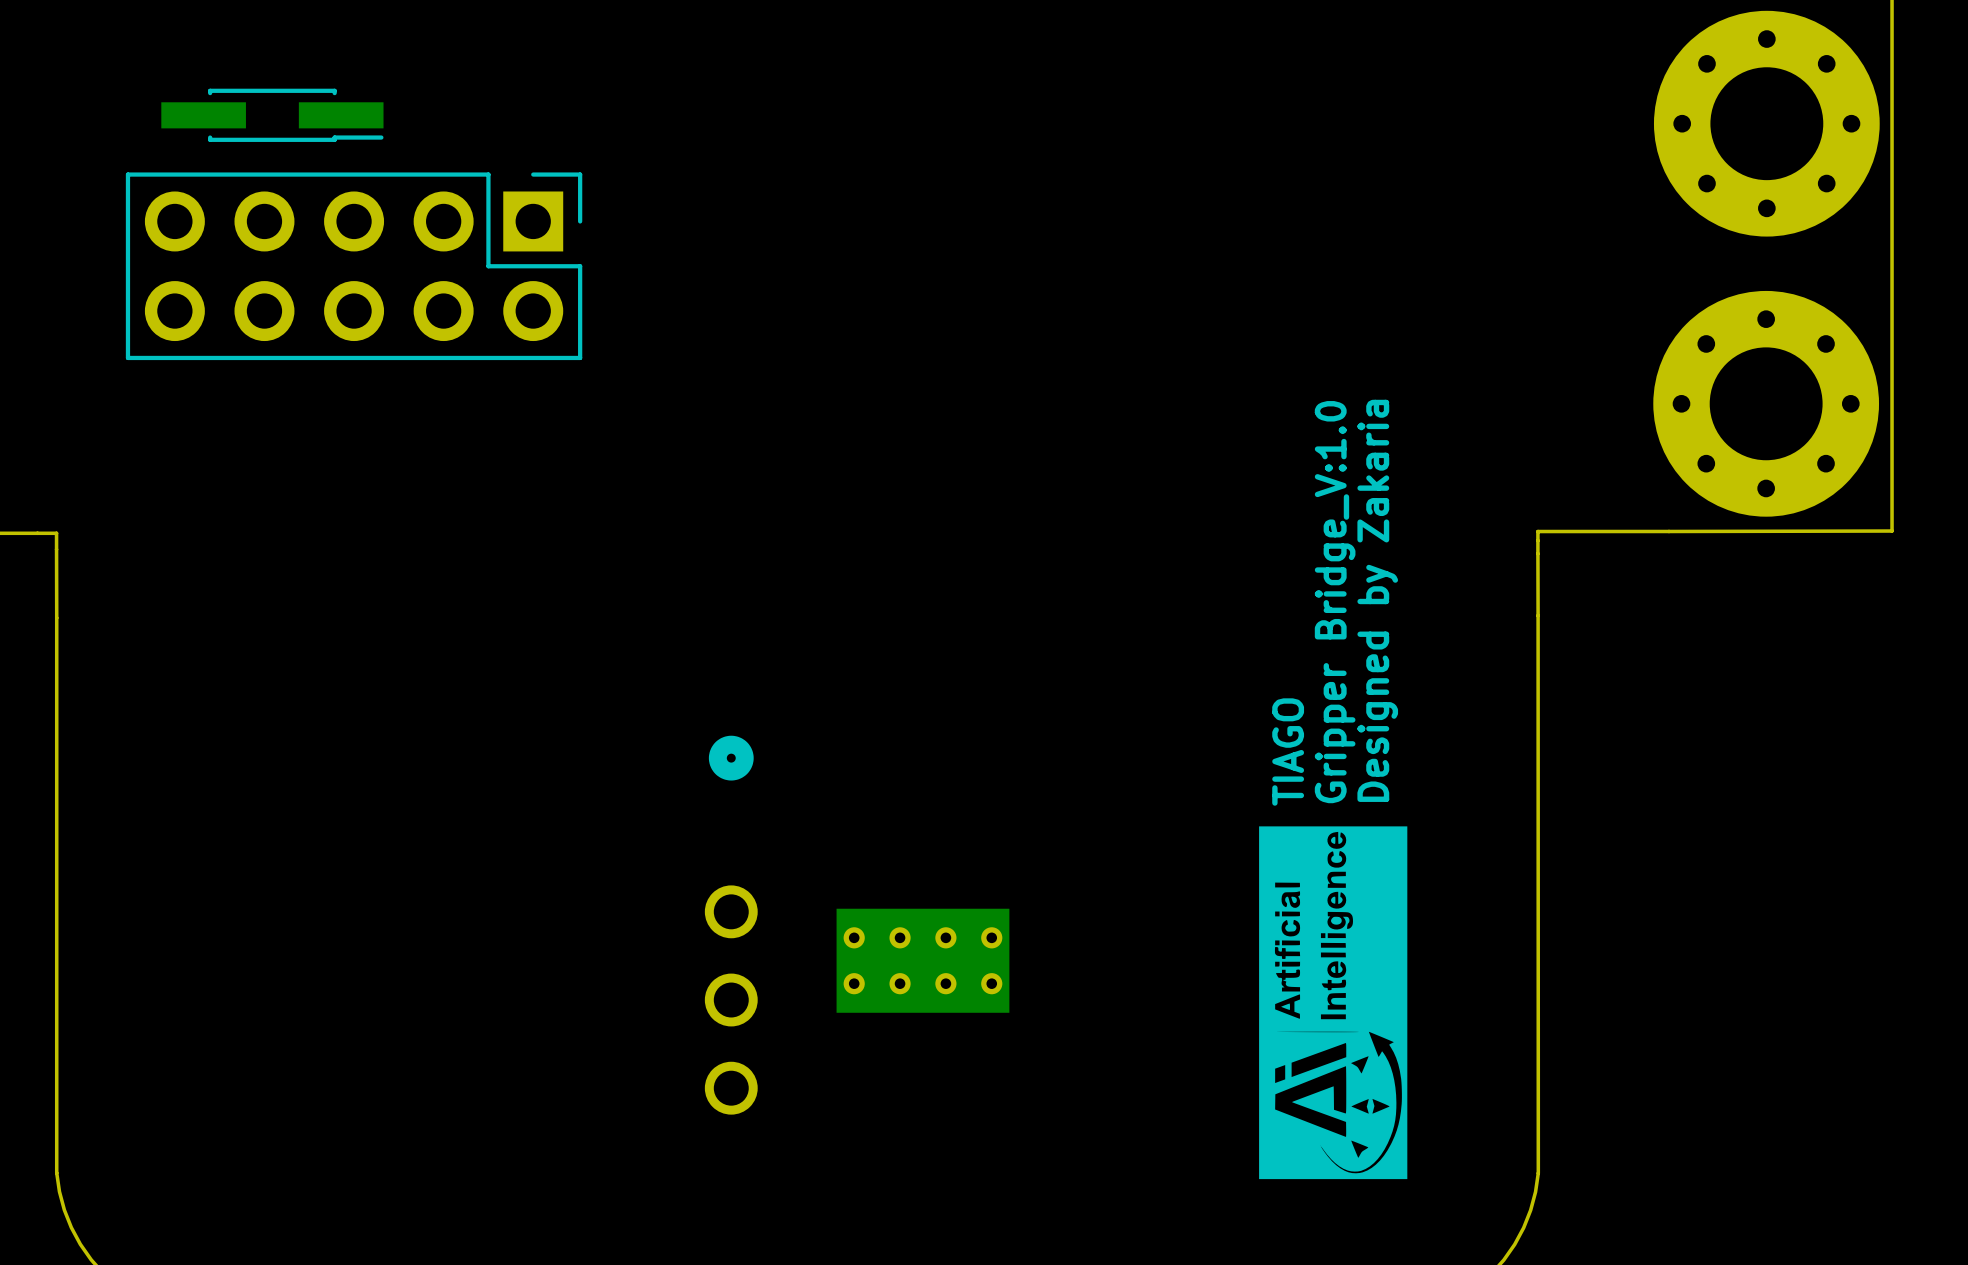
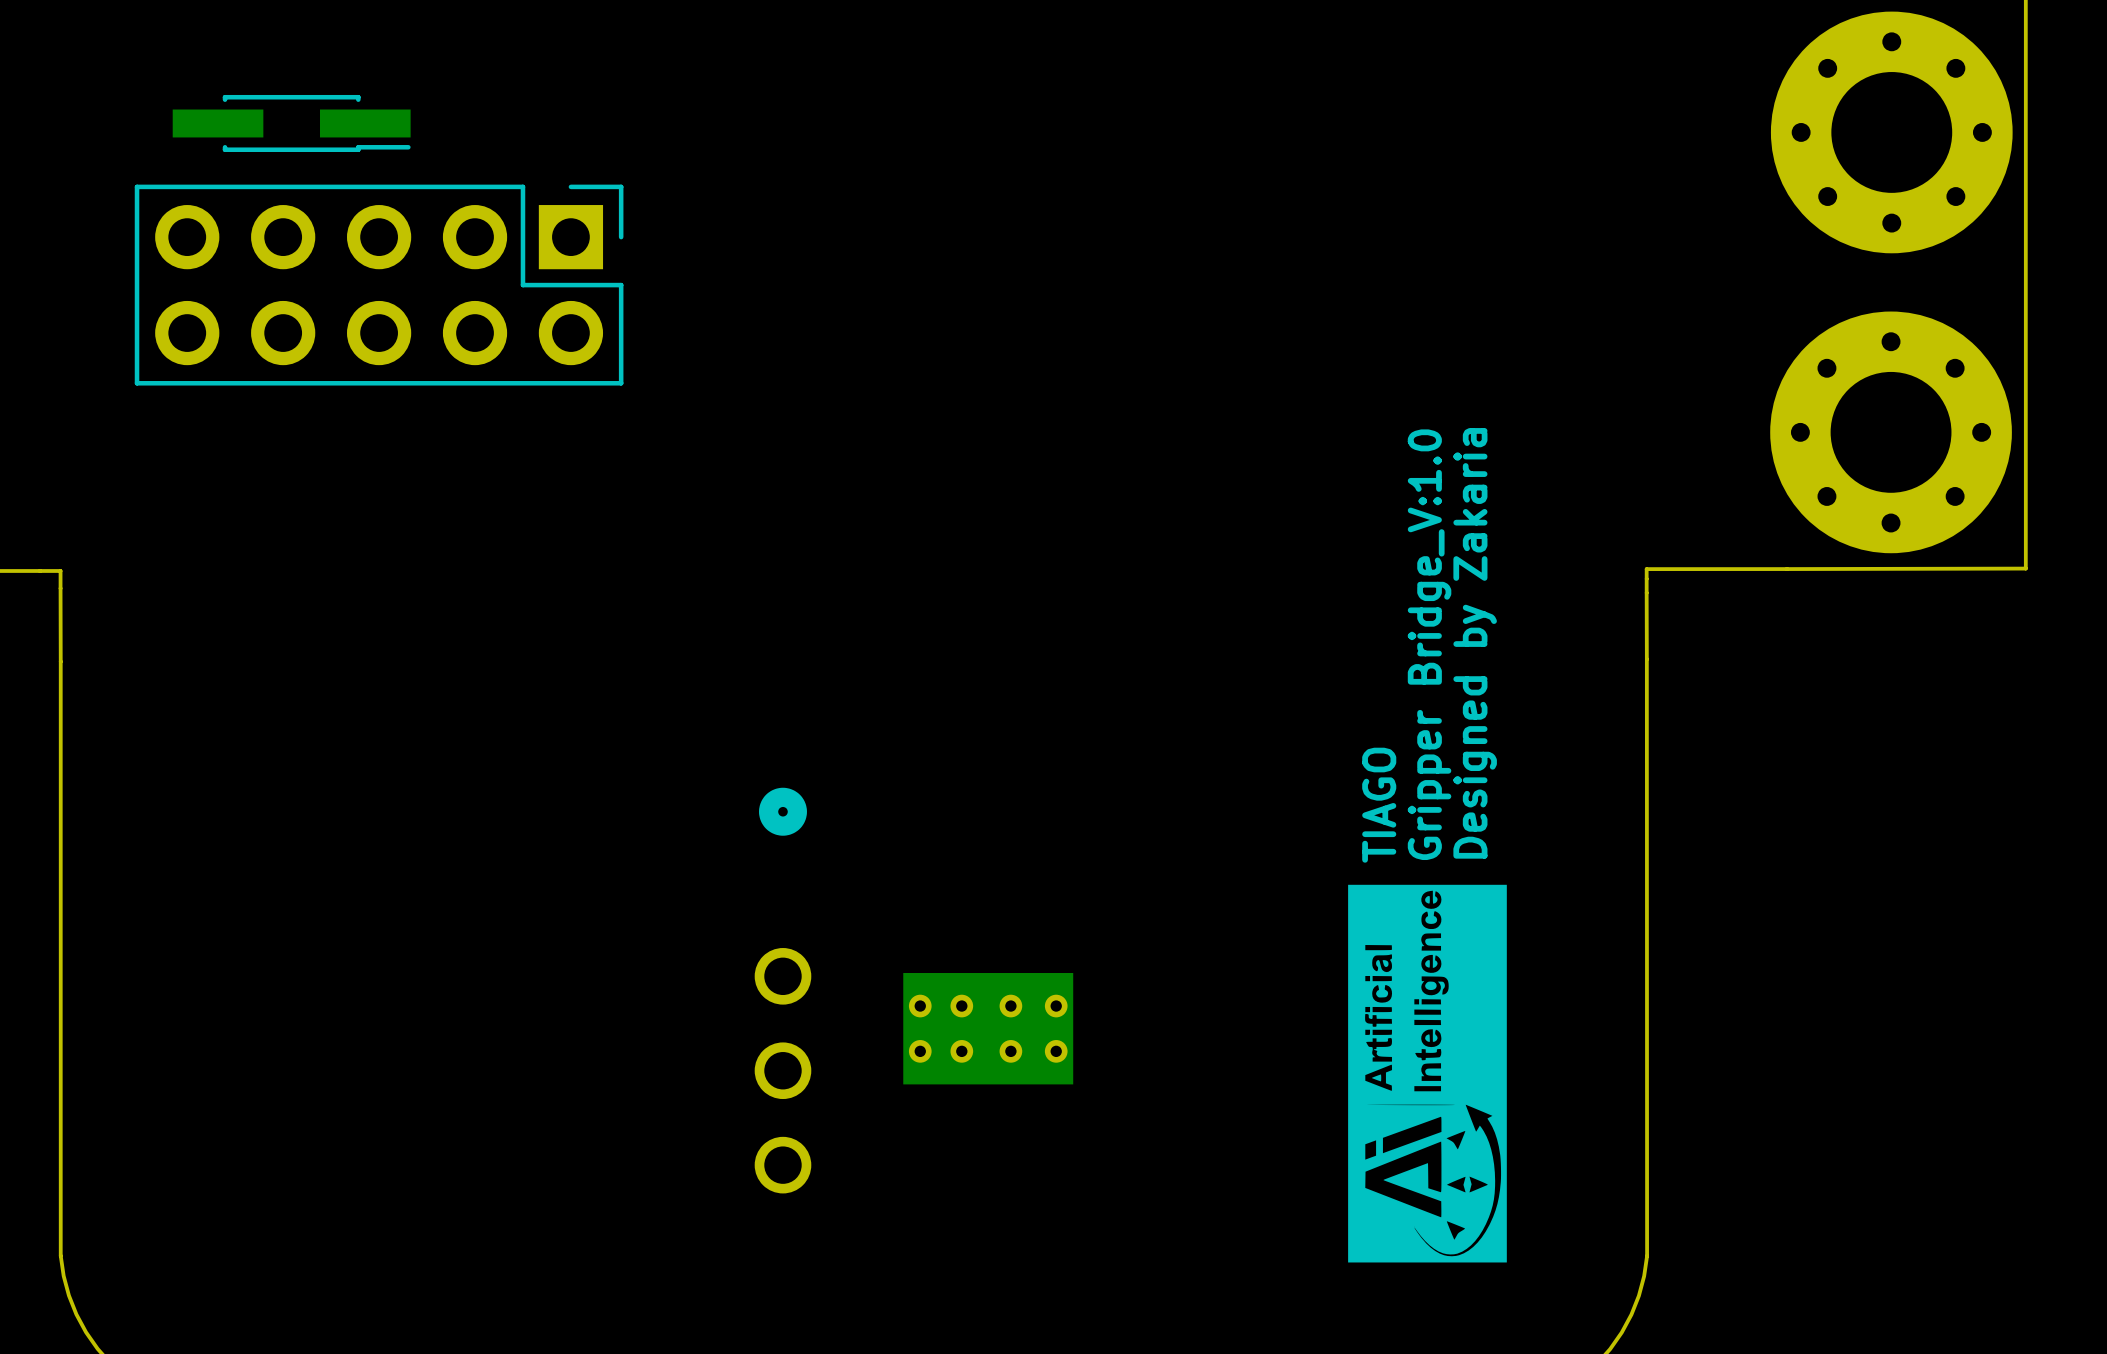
part footprint: [836, 908, 1010, 1013] -> [903, 973, 1074, 1085]

